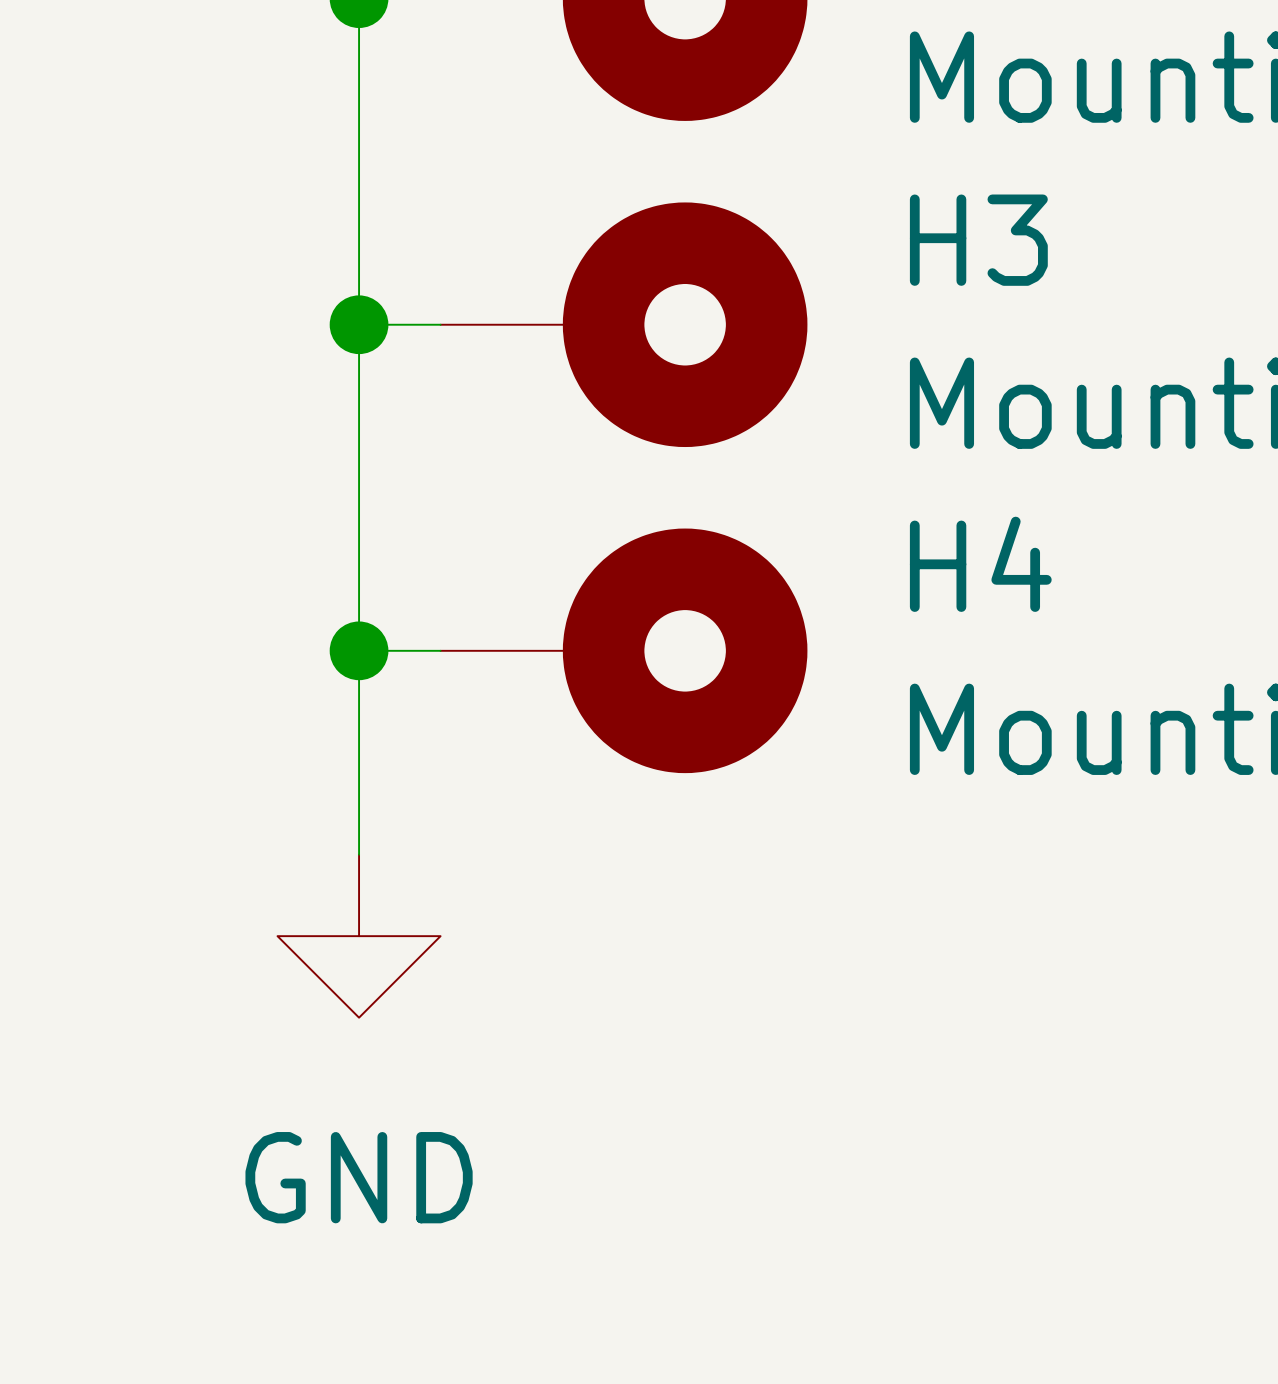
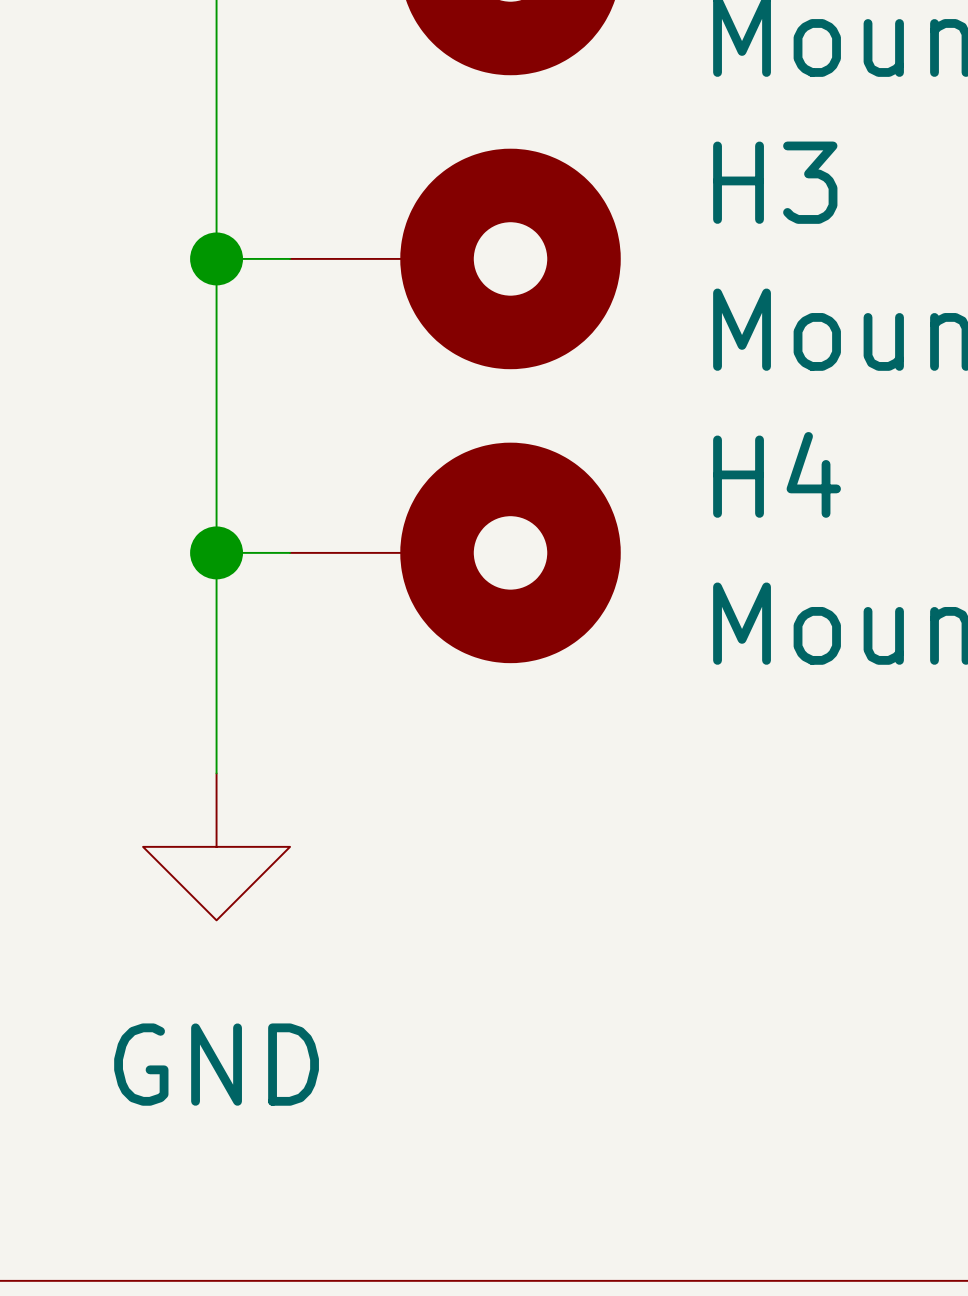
power symbol position: GND (359, 936) -> GND (216, 846)

